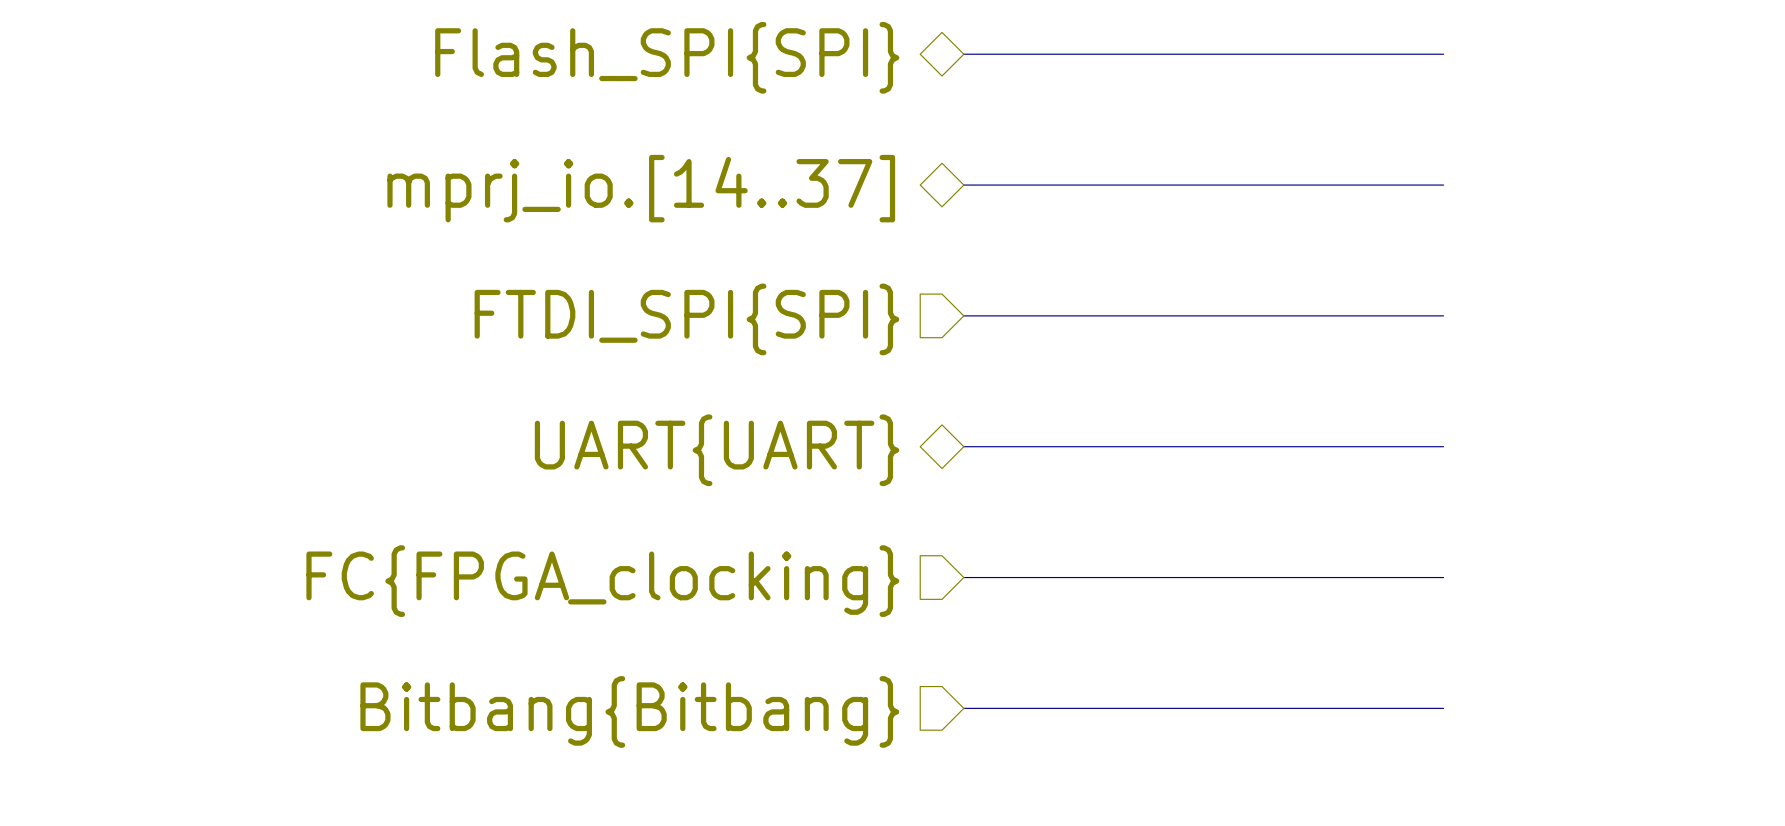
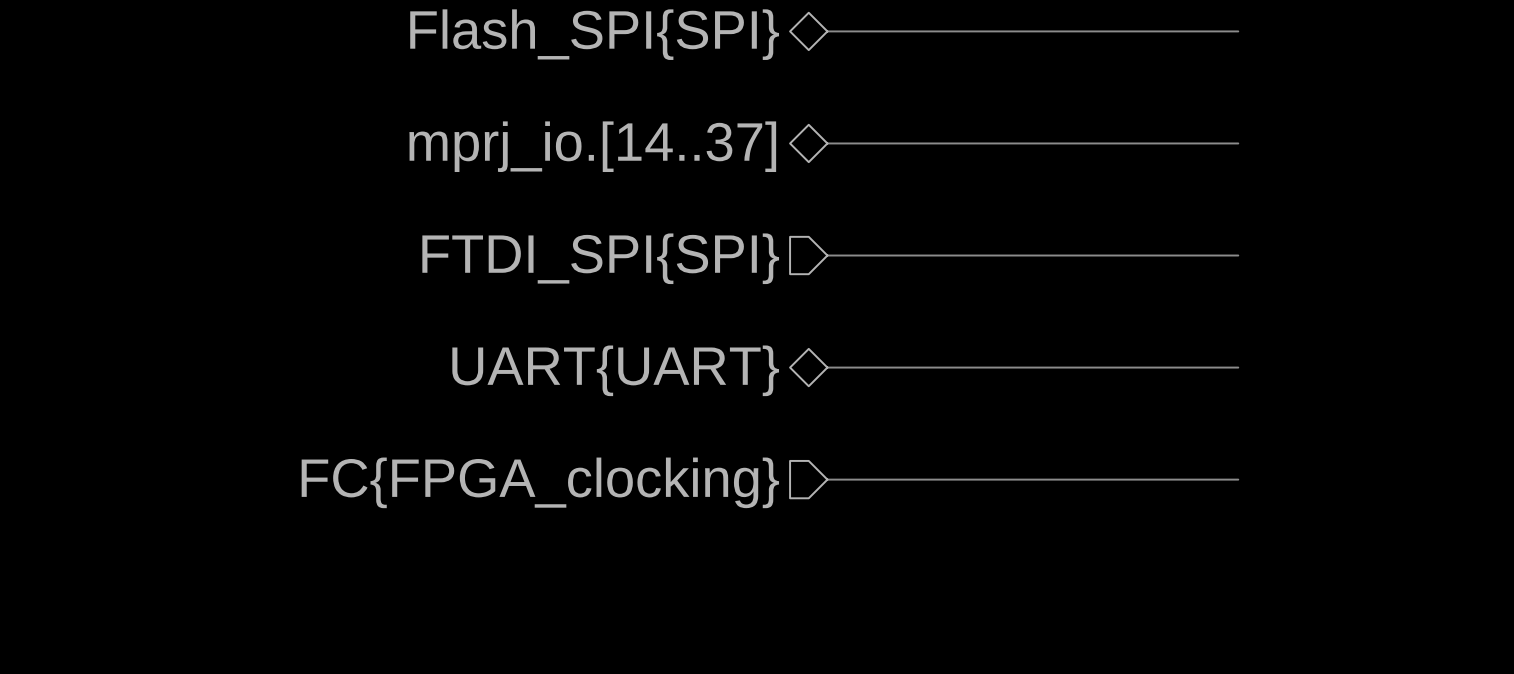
bus: (963, 708) (1443, 708) -> none
hierarchical label: Bitbang{Bitbang} (629, 711) -> none

